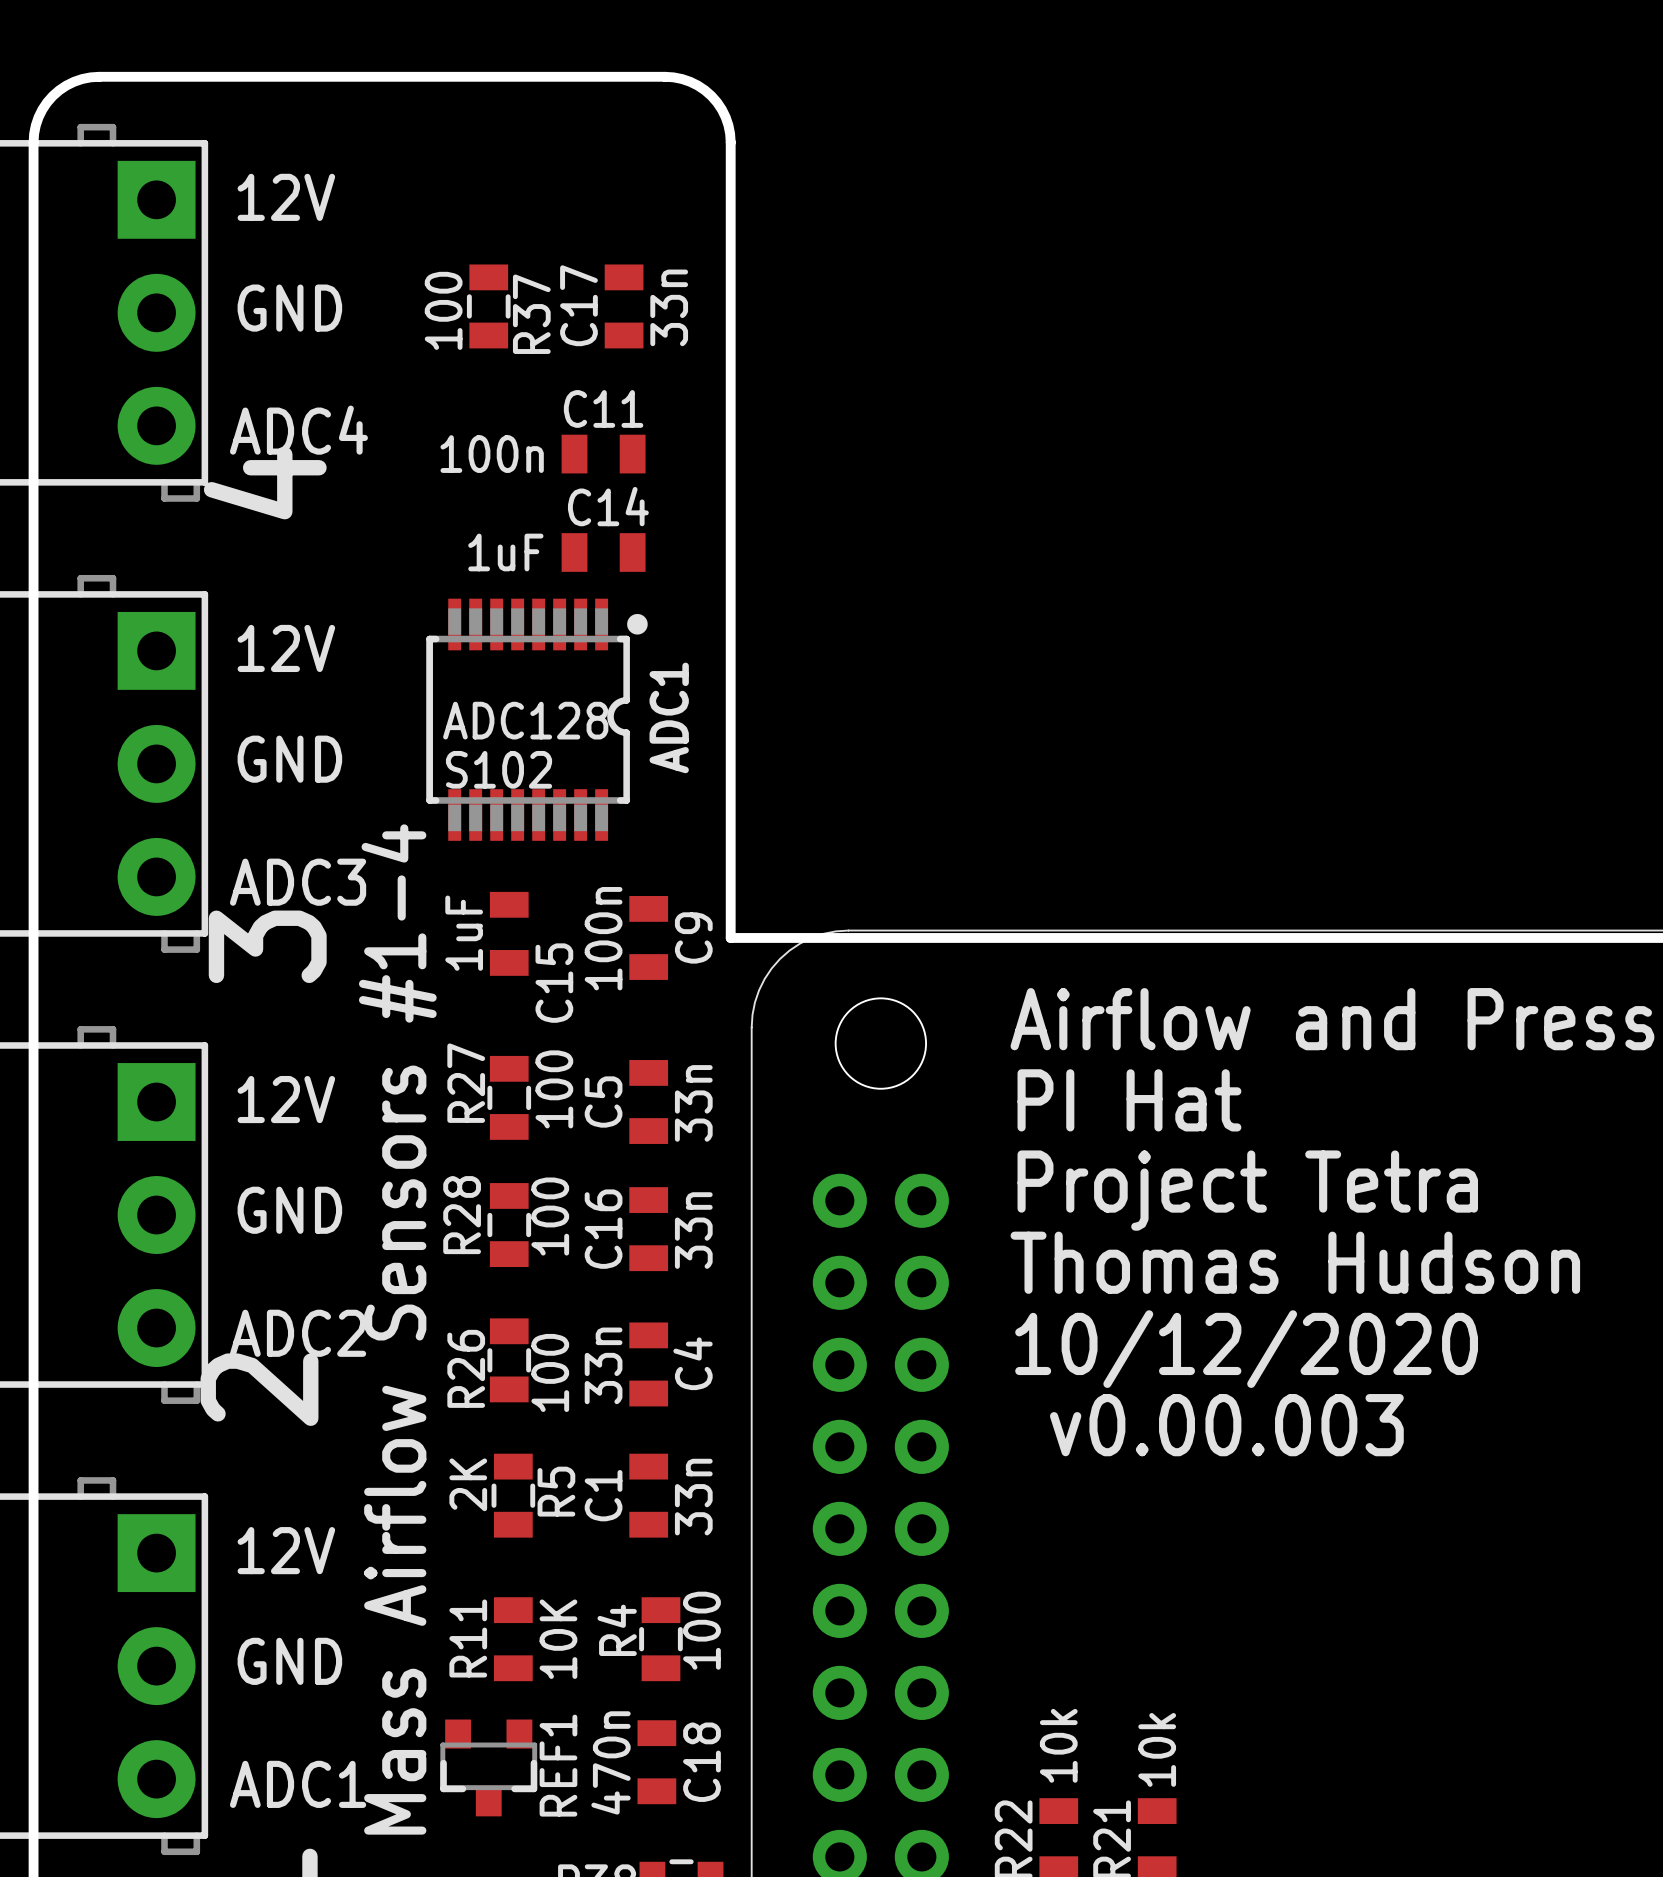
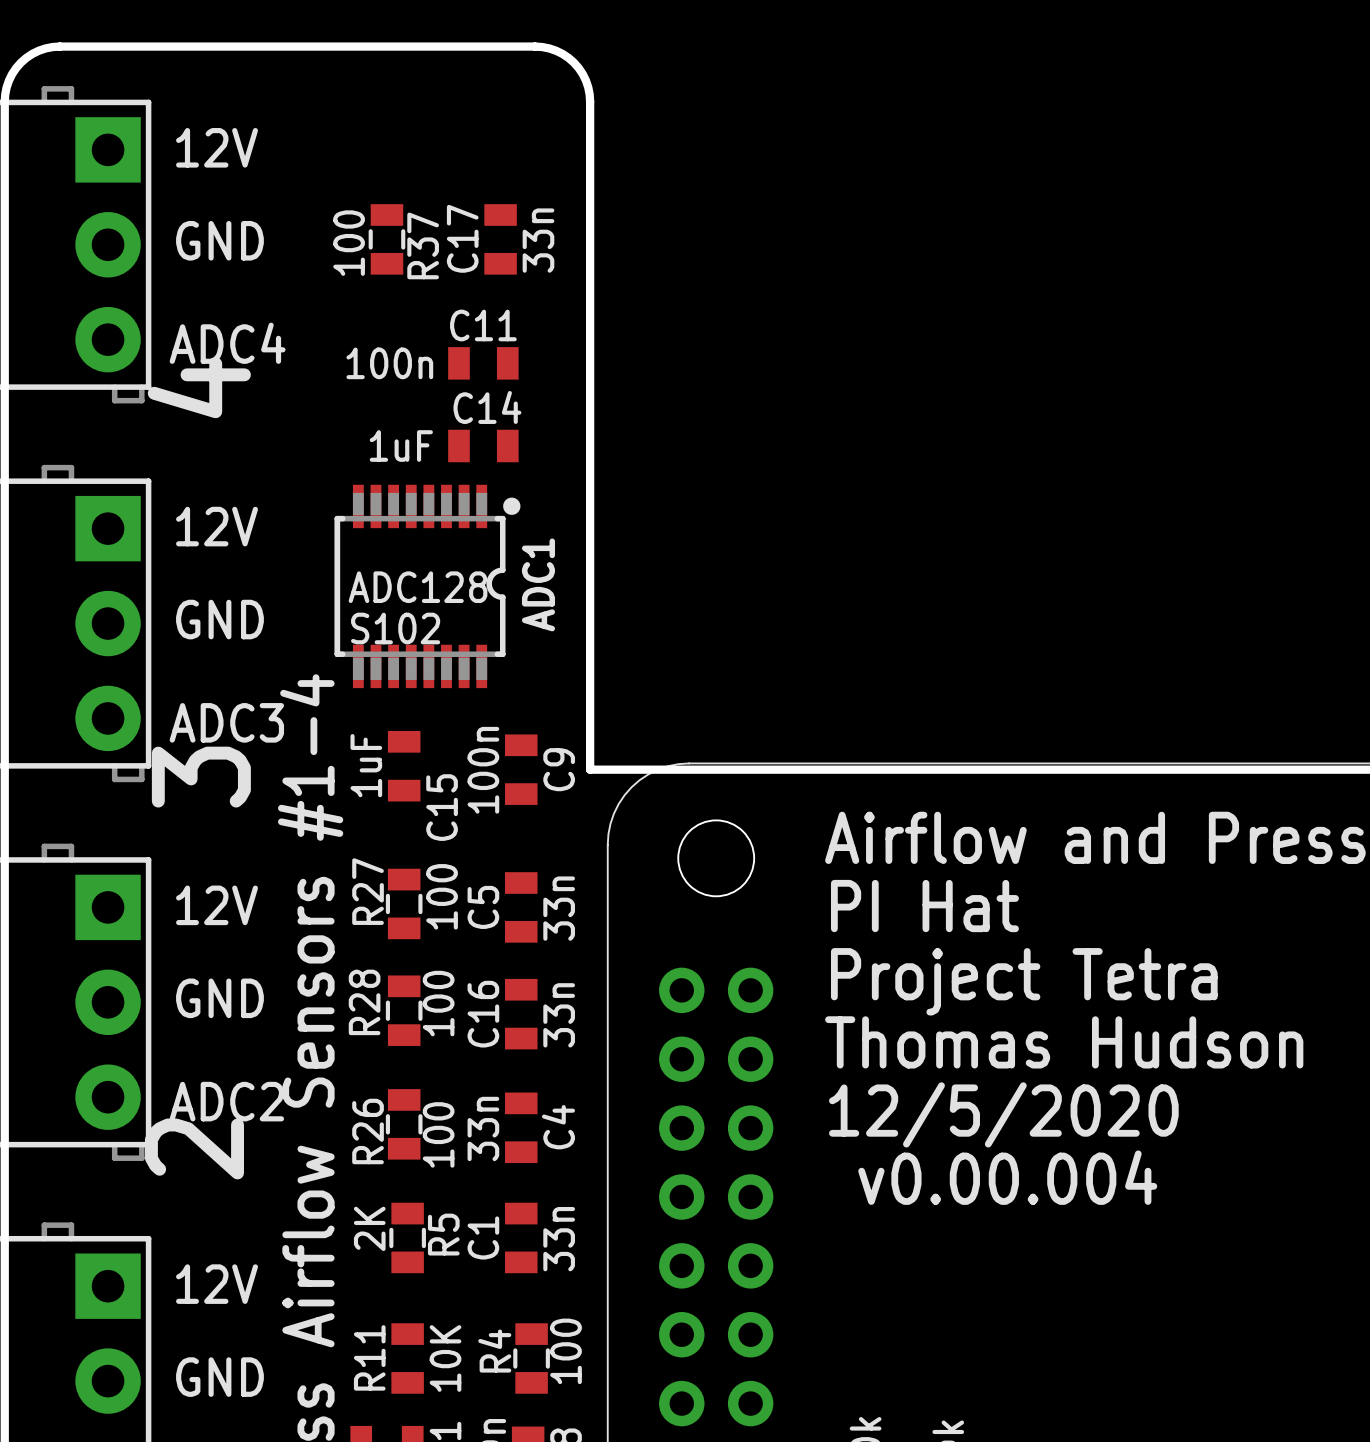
text: 10/12/2020 (1246, 1349) -> 12/5/2020 (1003, 1114)
text: v0.00.003 (1226, 1425) -> v0.00.004 (1007, 1177)

